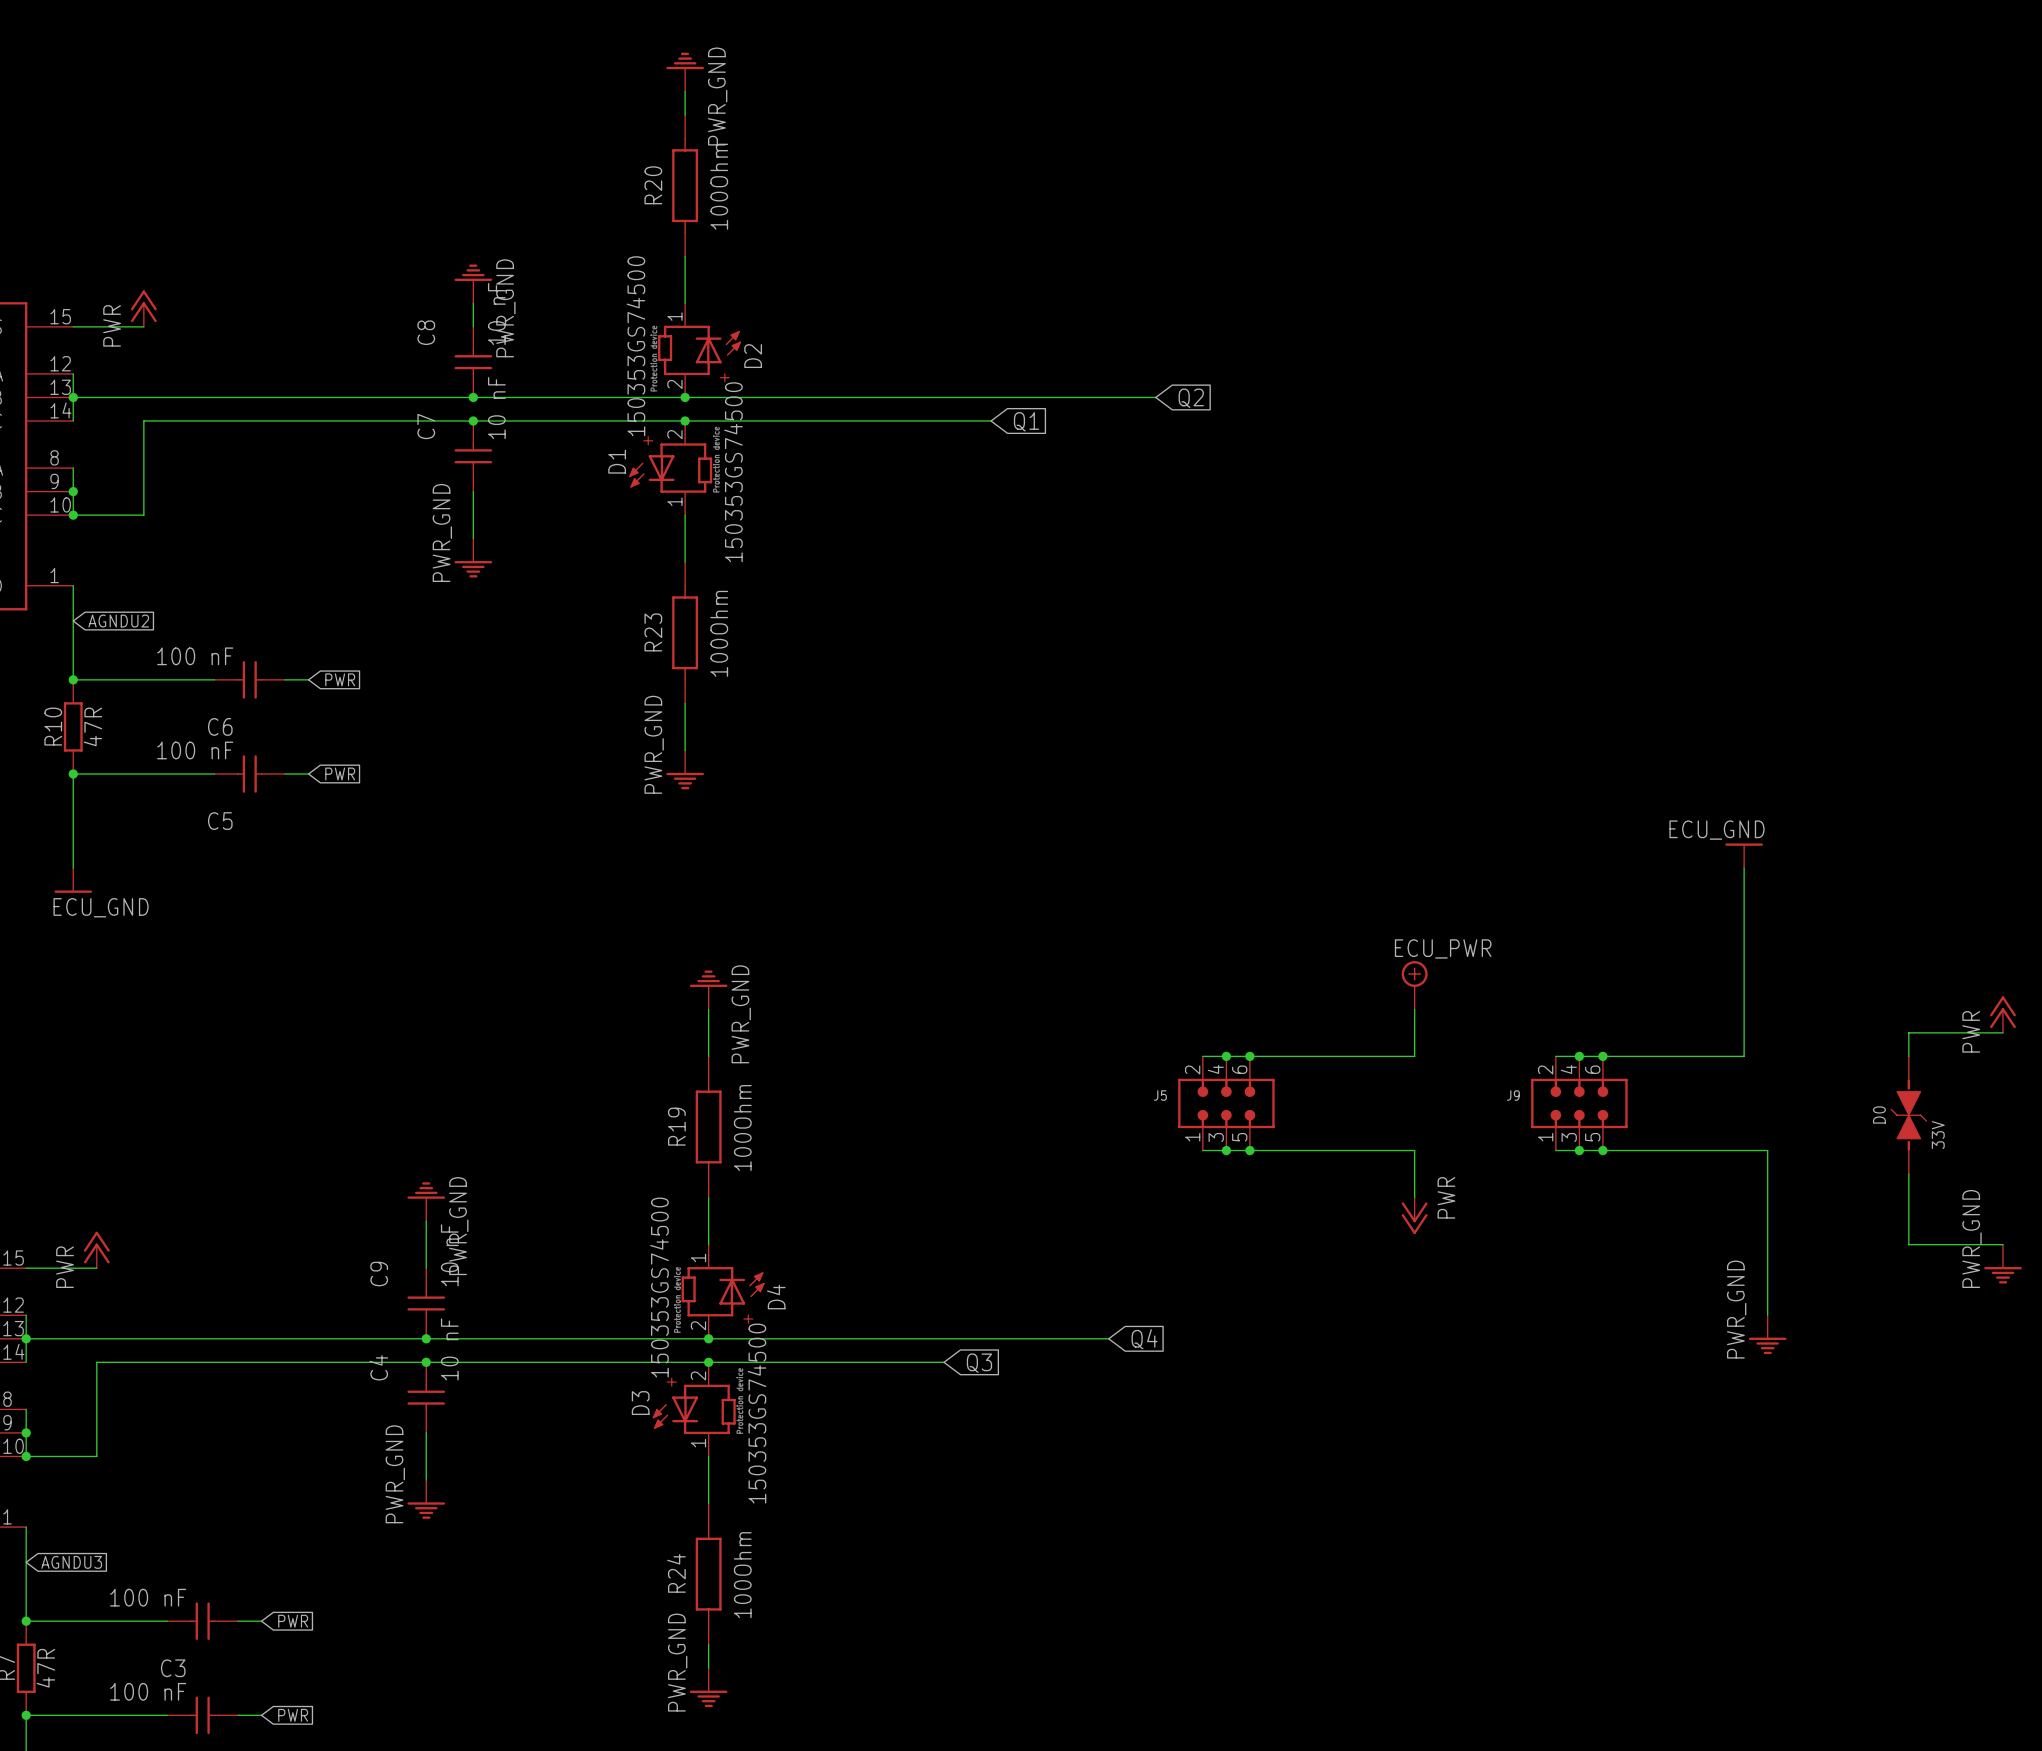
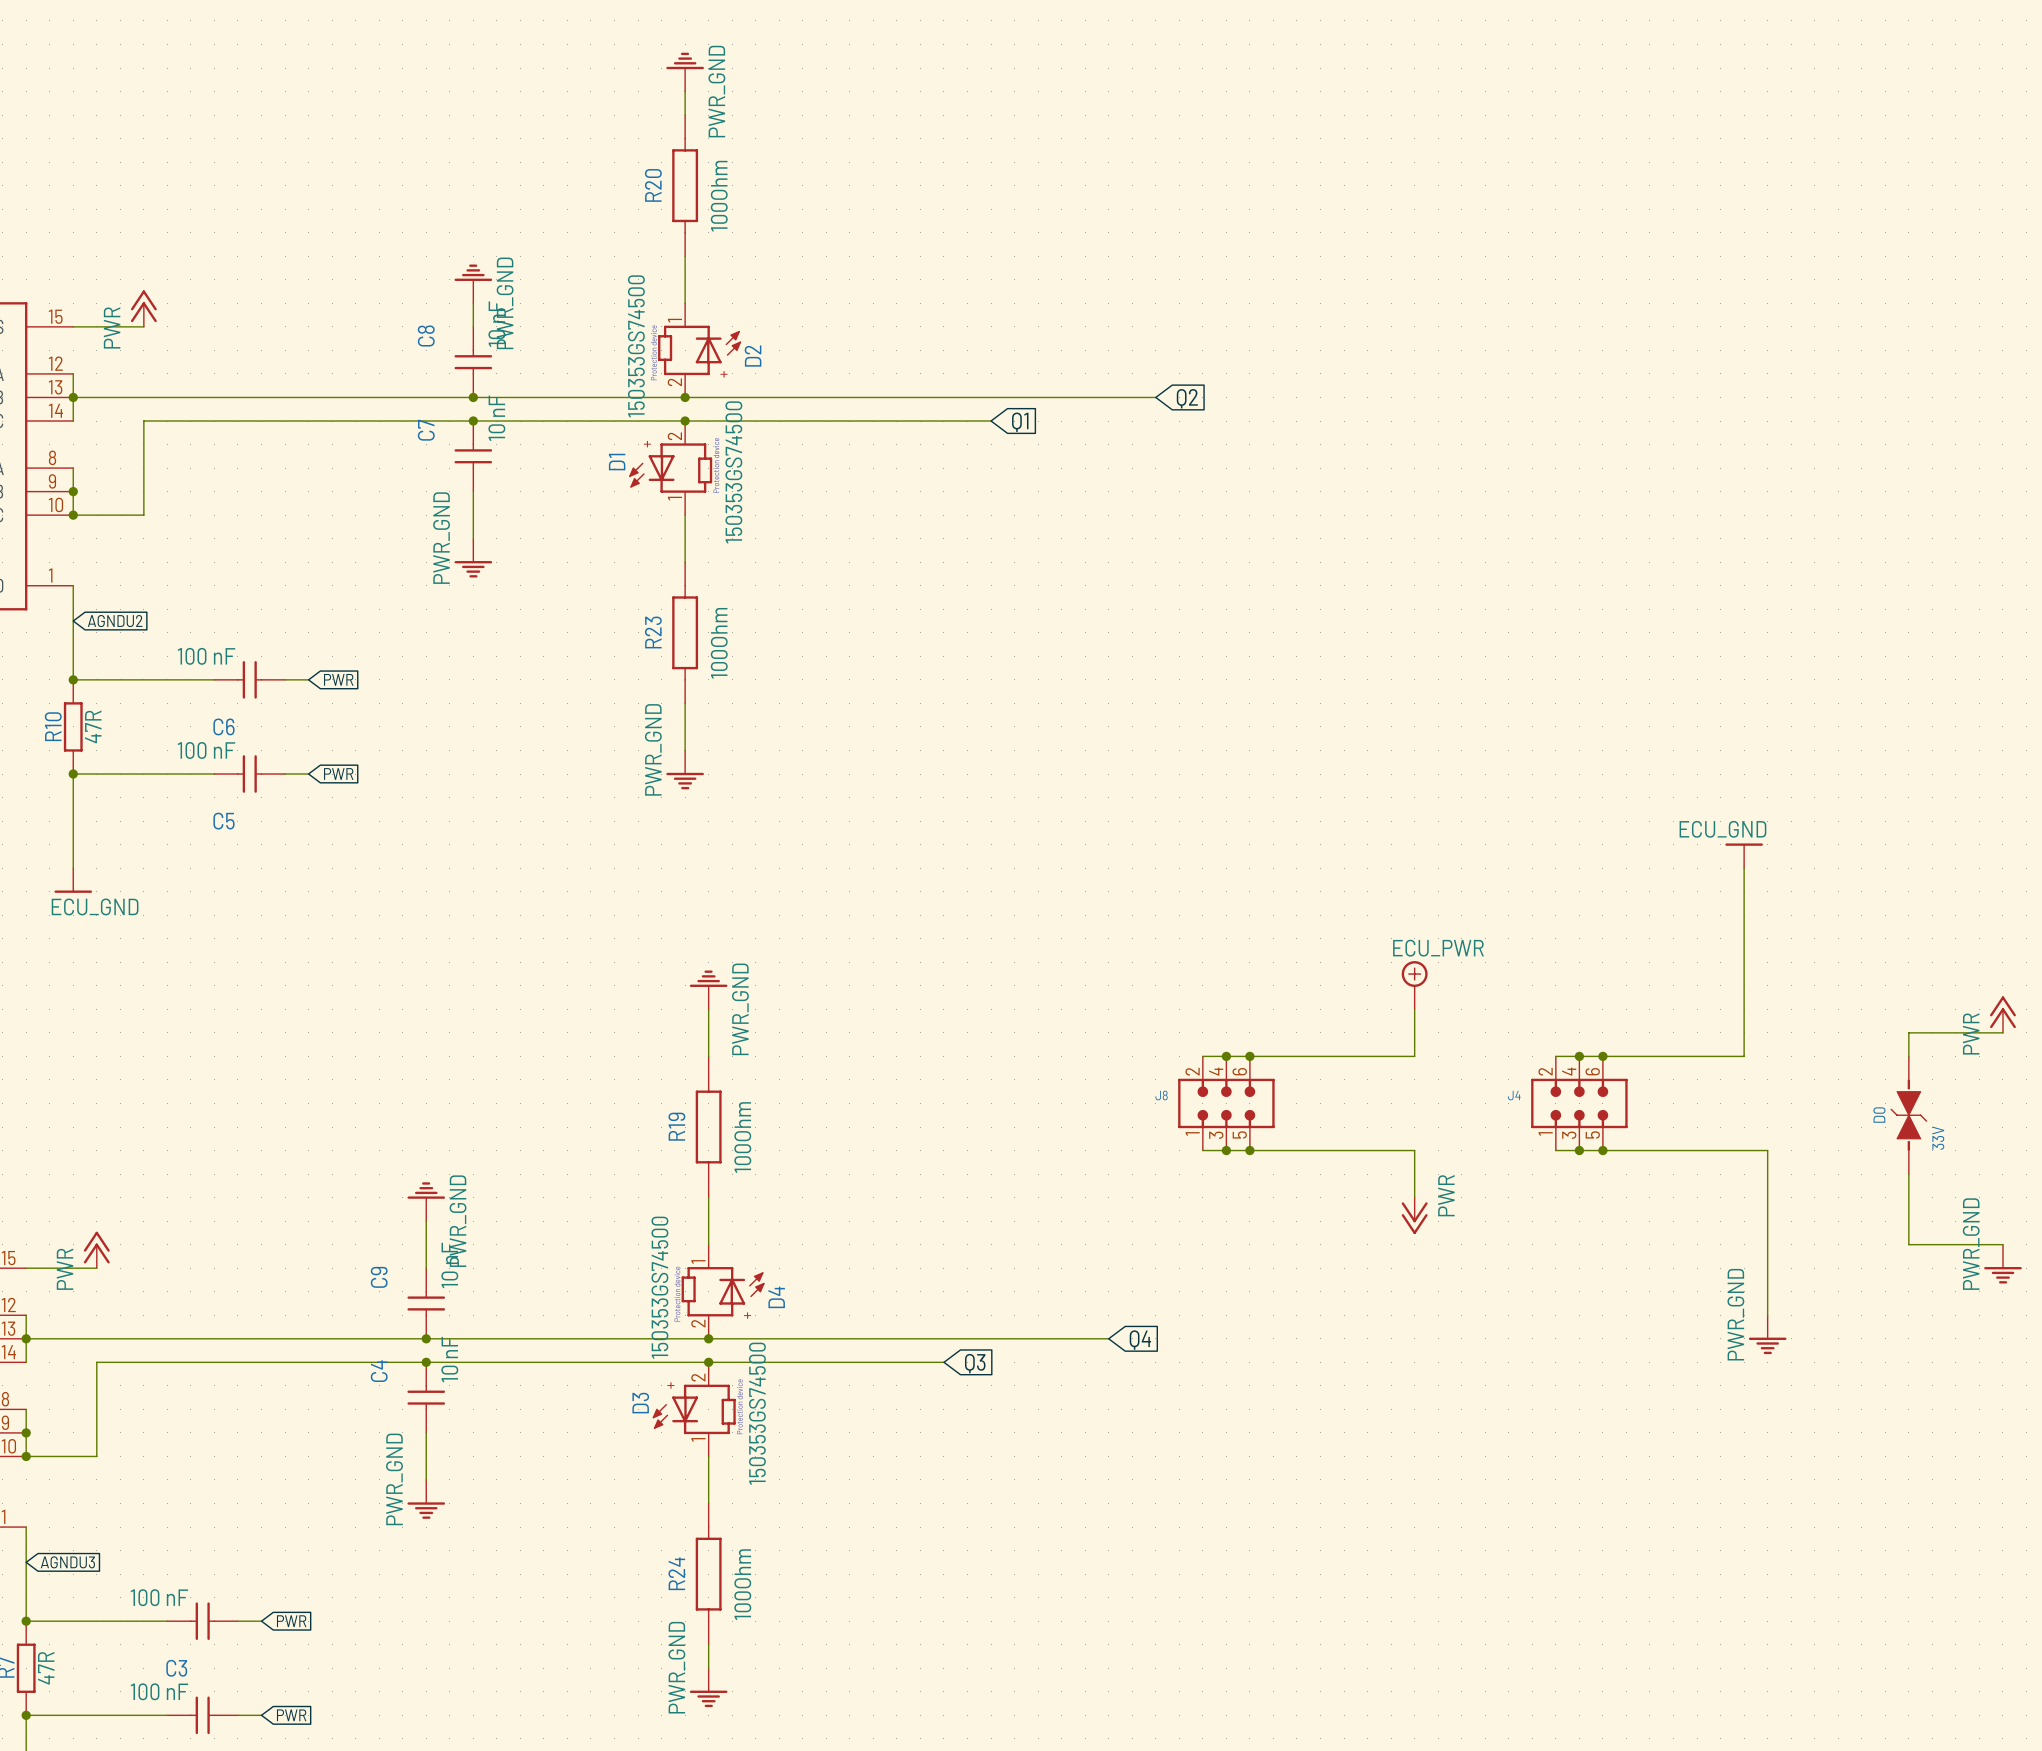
J5 name: J5 (1160, 1095) -> J8 (1161, 1095)
J9 name: J9 (1513, 1095) -> J4 (1514, 1095)

